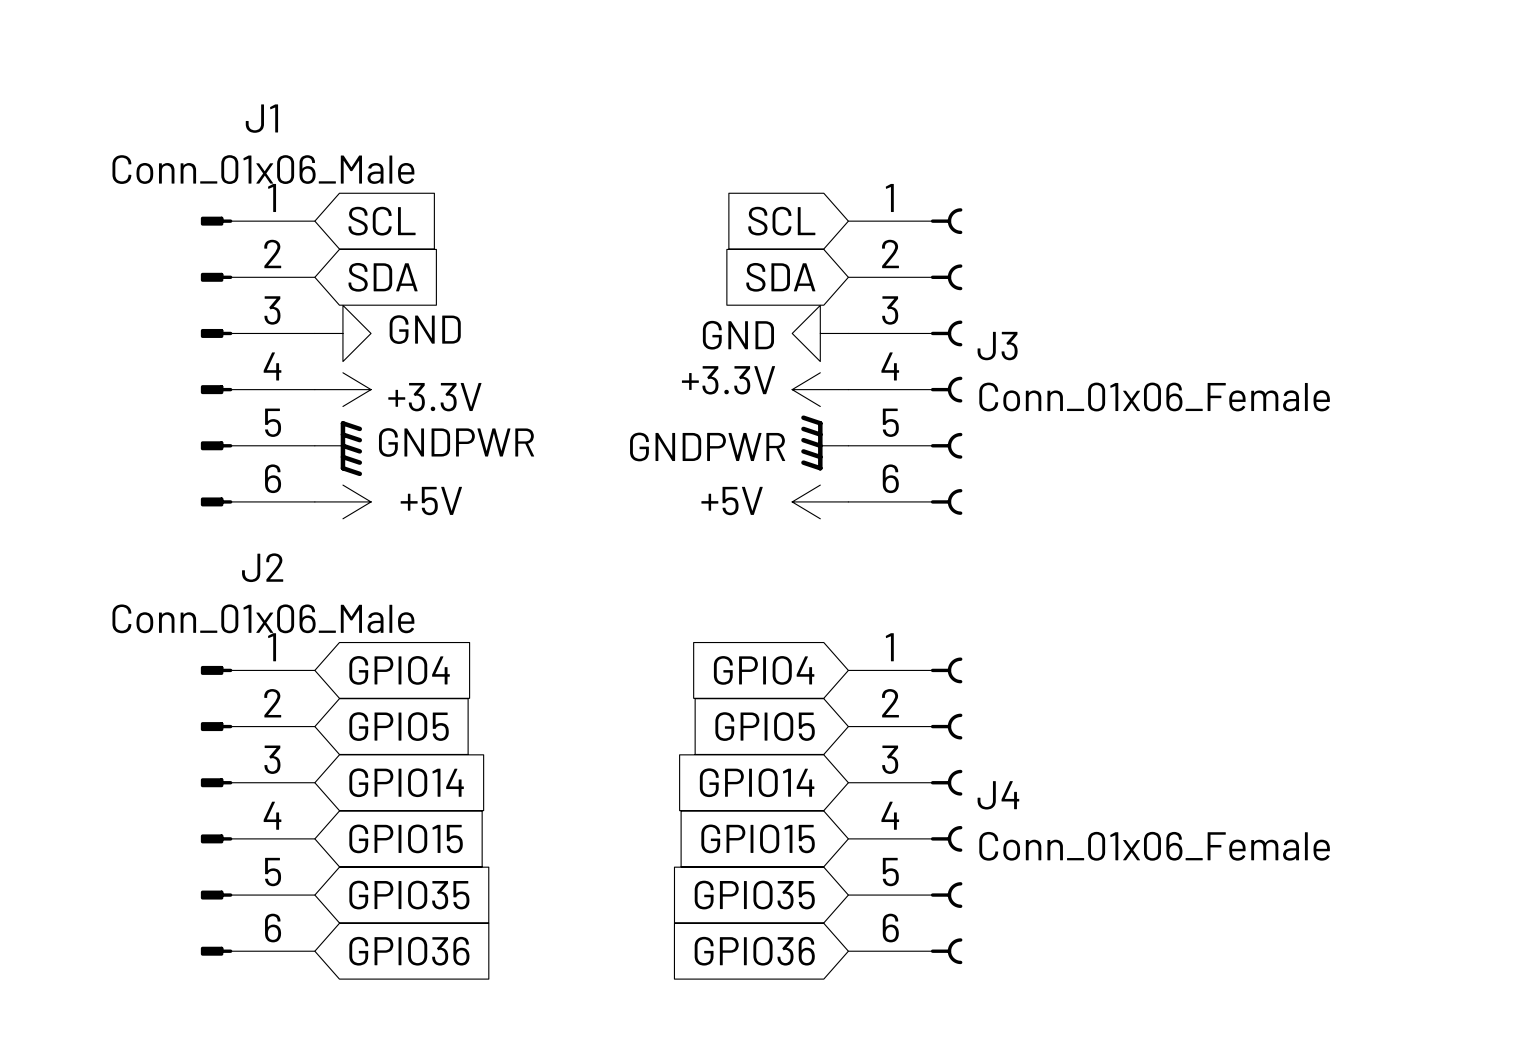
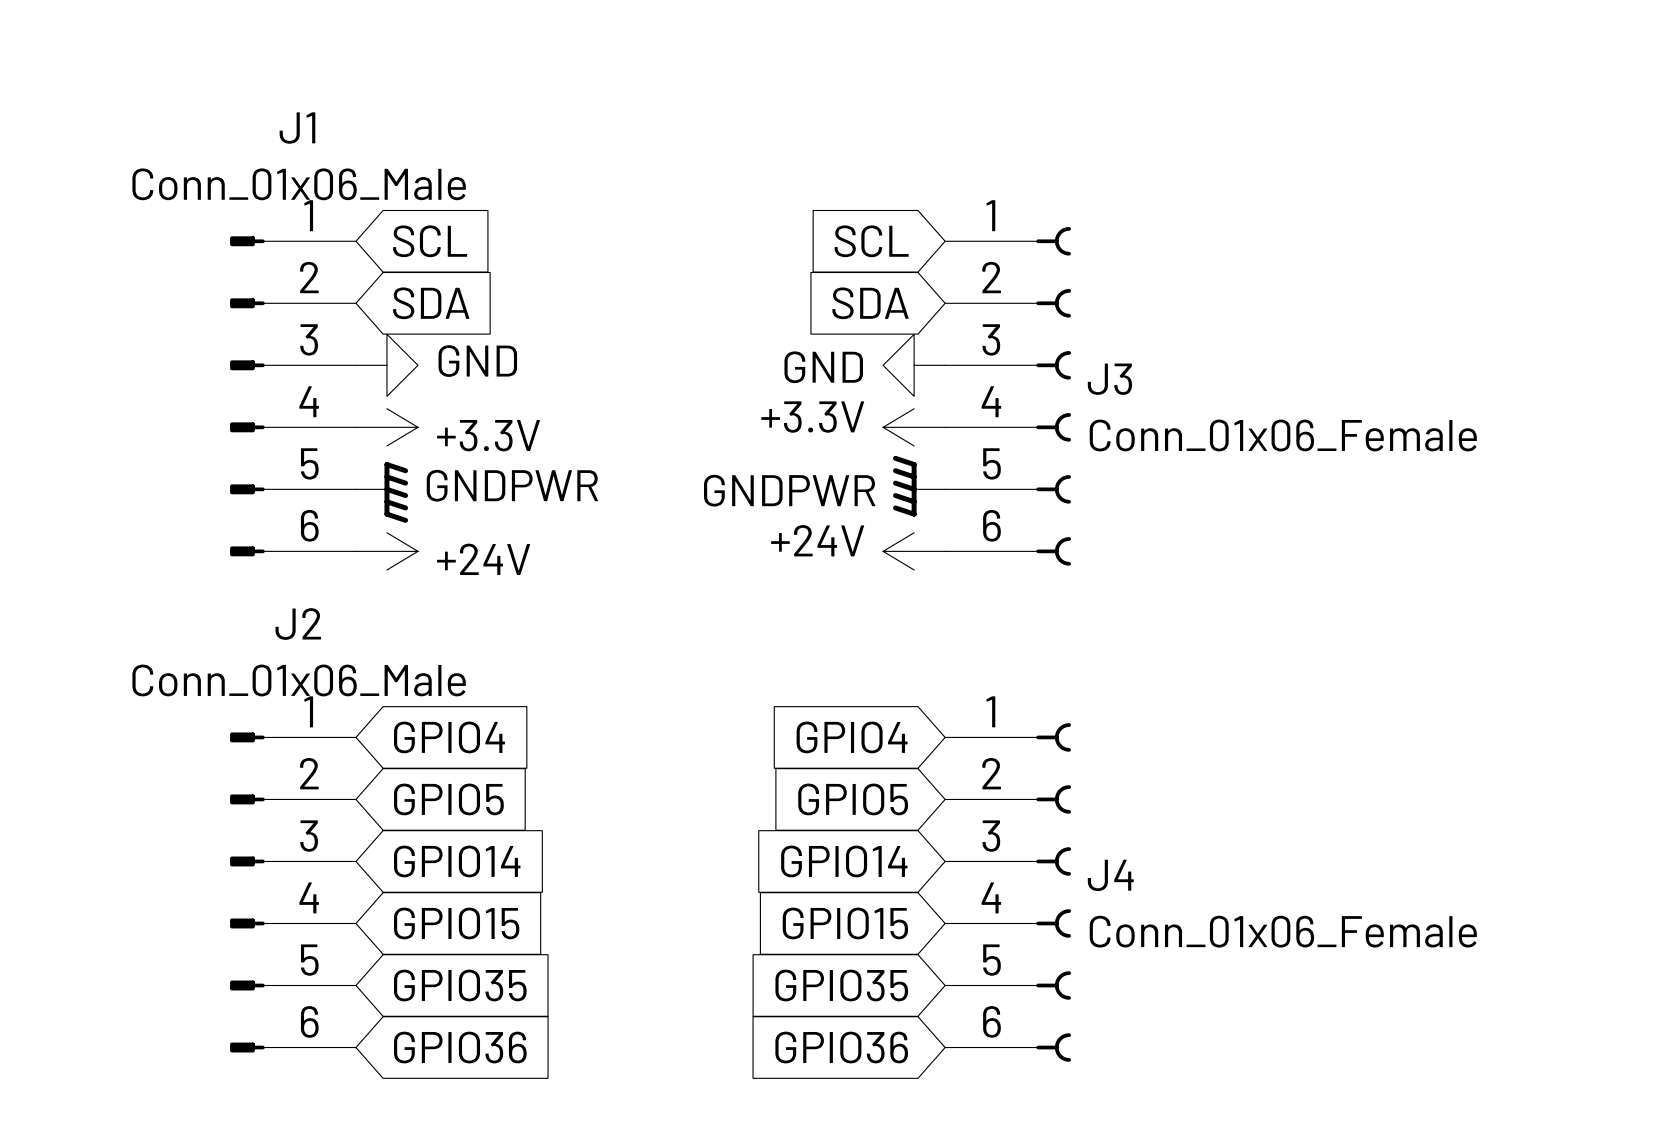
power symbol: +5V (342, 501) -> +24V (386, 551)
power symbol: +5V (820, 501) -> +24V (914, 551)

